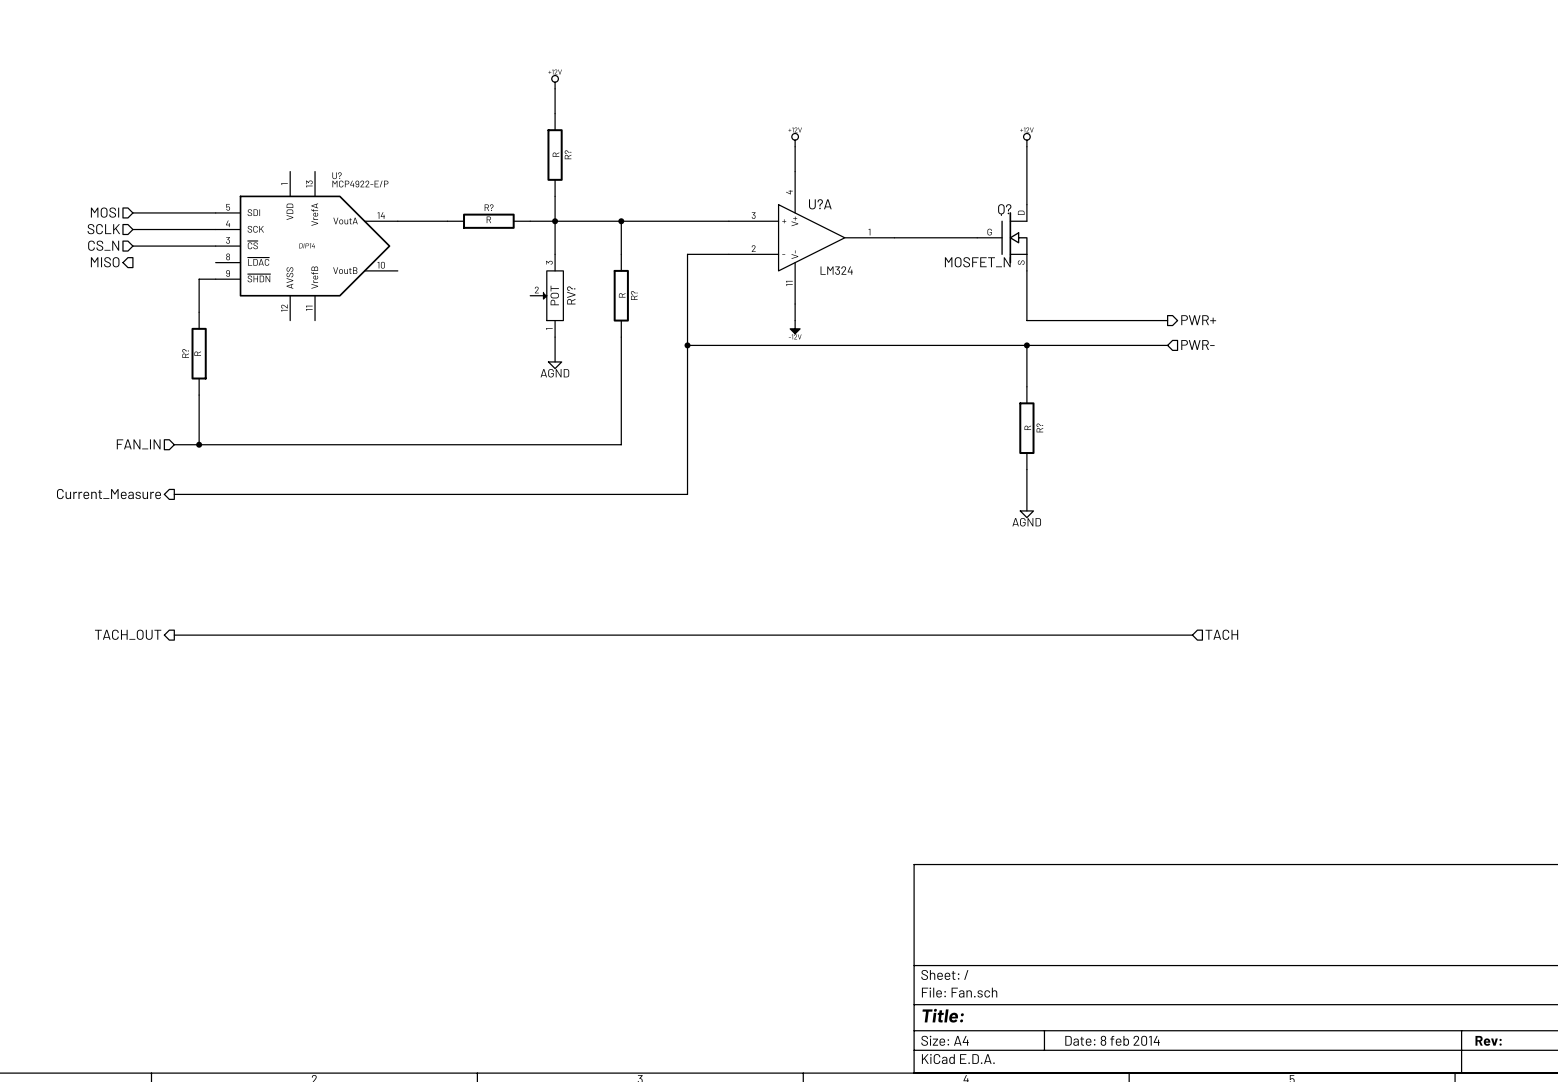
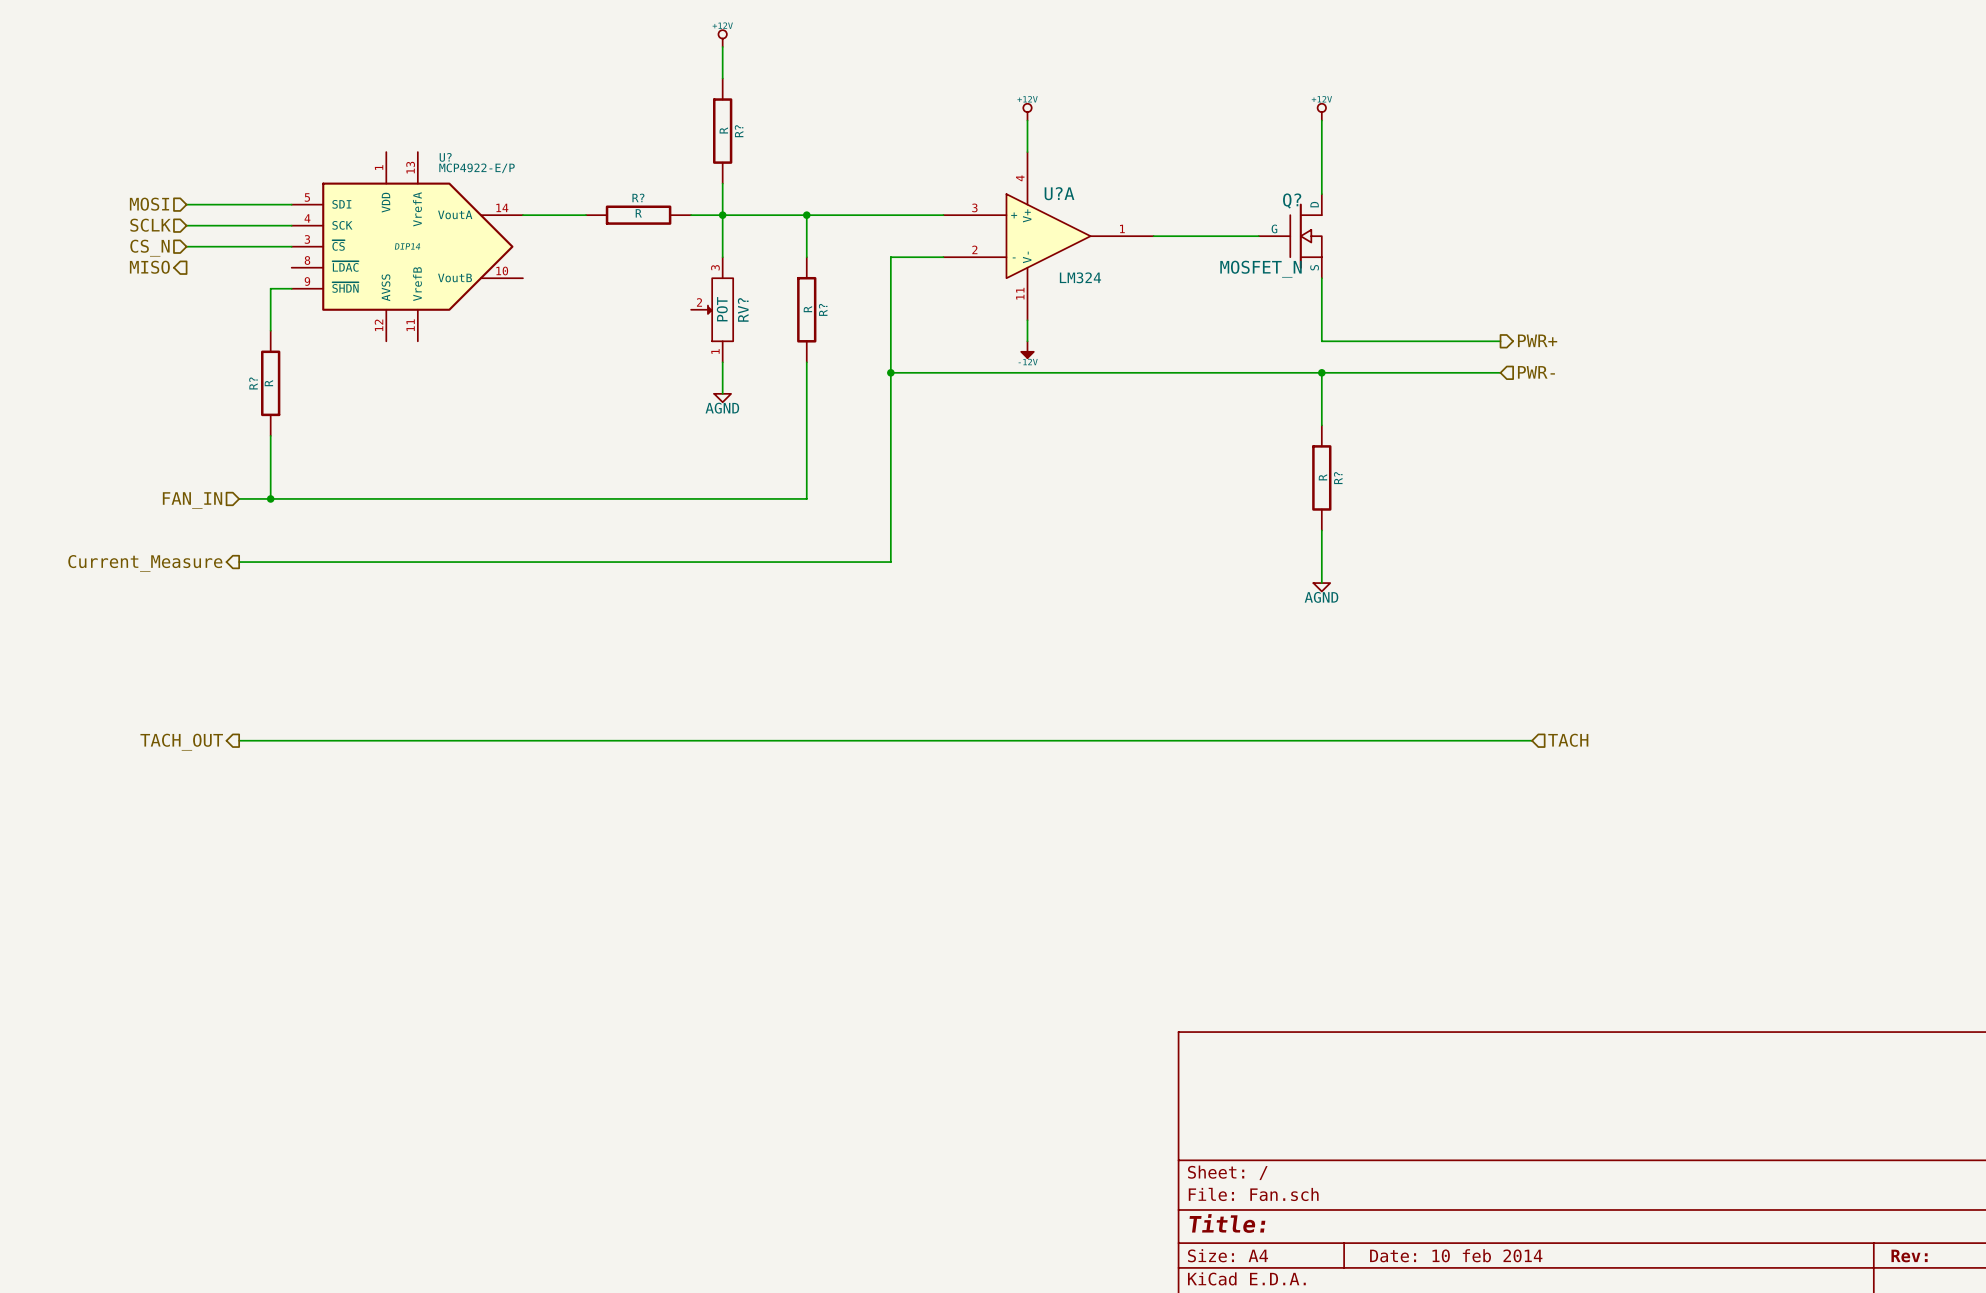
title block: Date: 8 feb 2014 (1112, 1040) -> Date: 10 feb 2014 (1456, 1255)

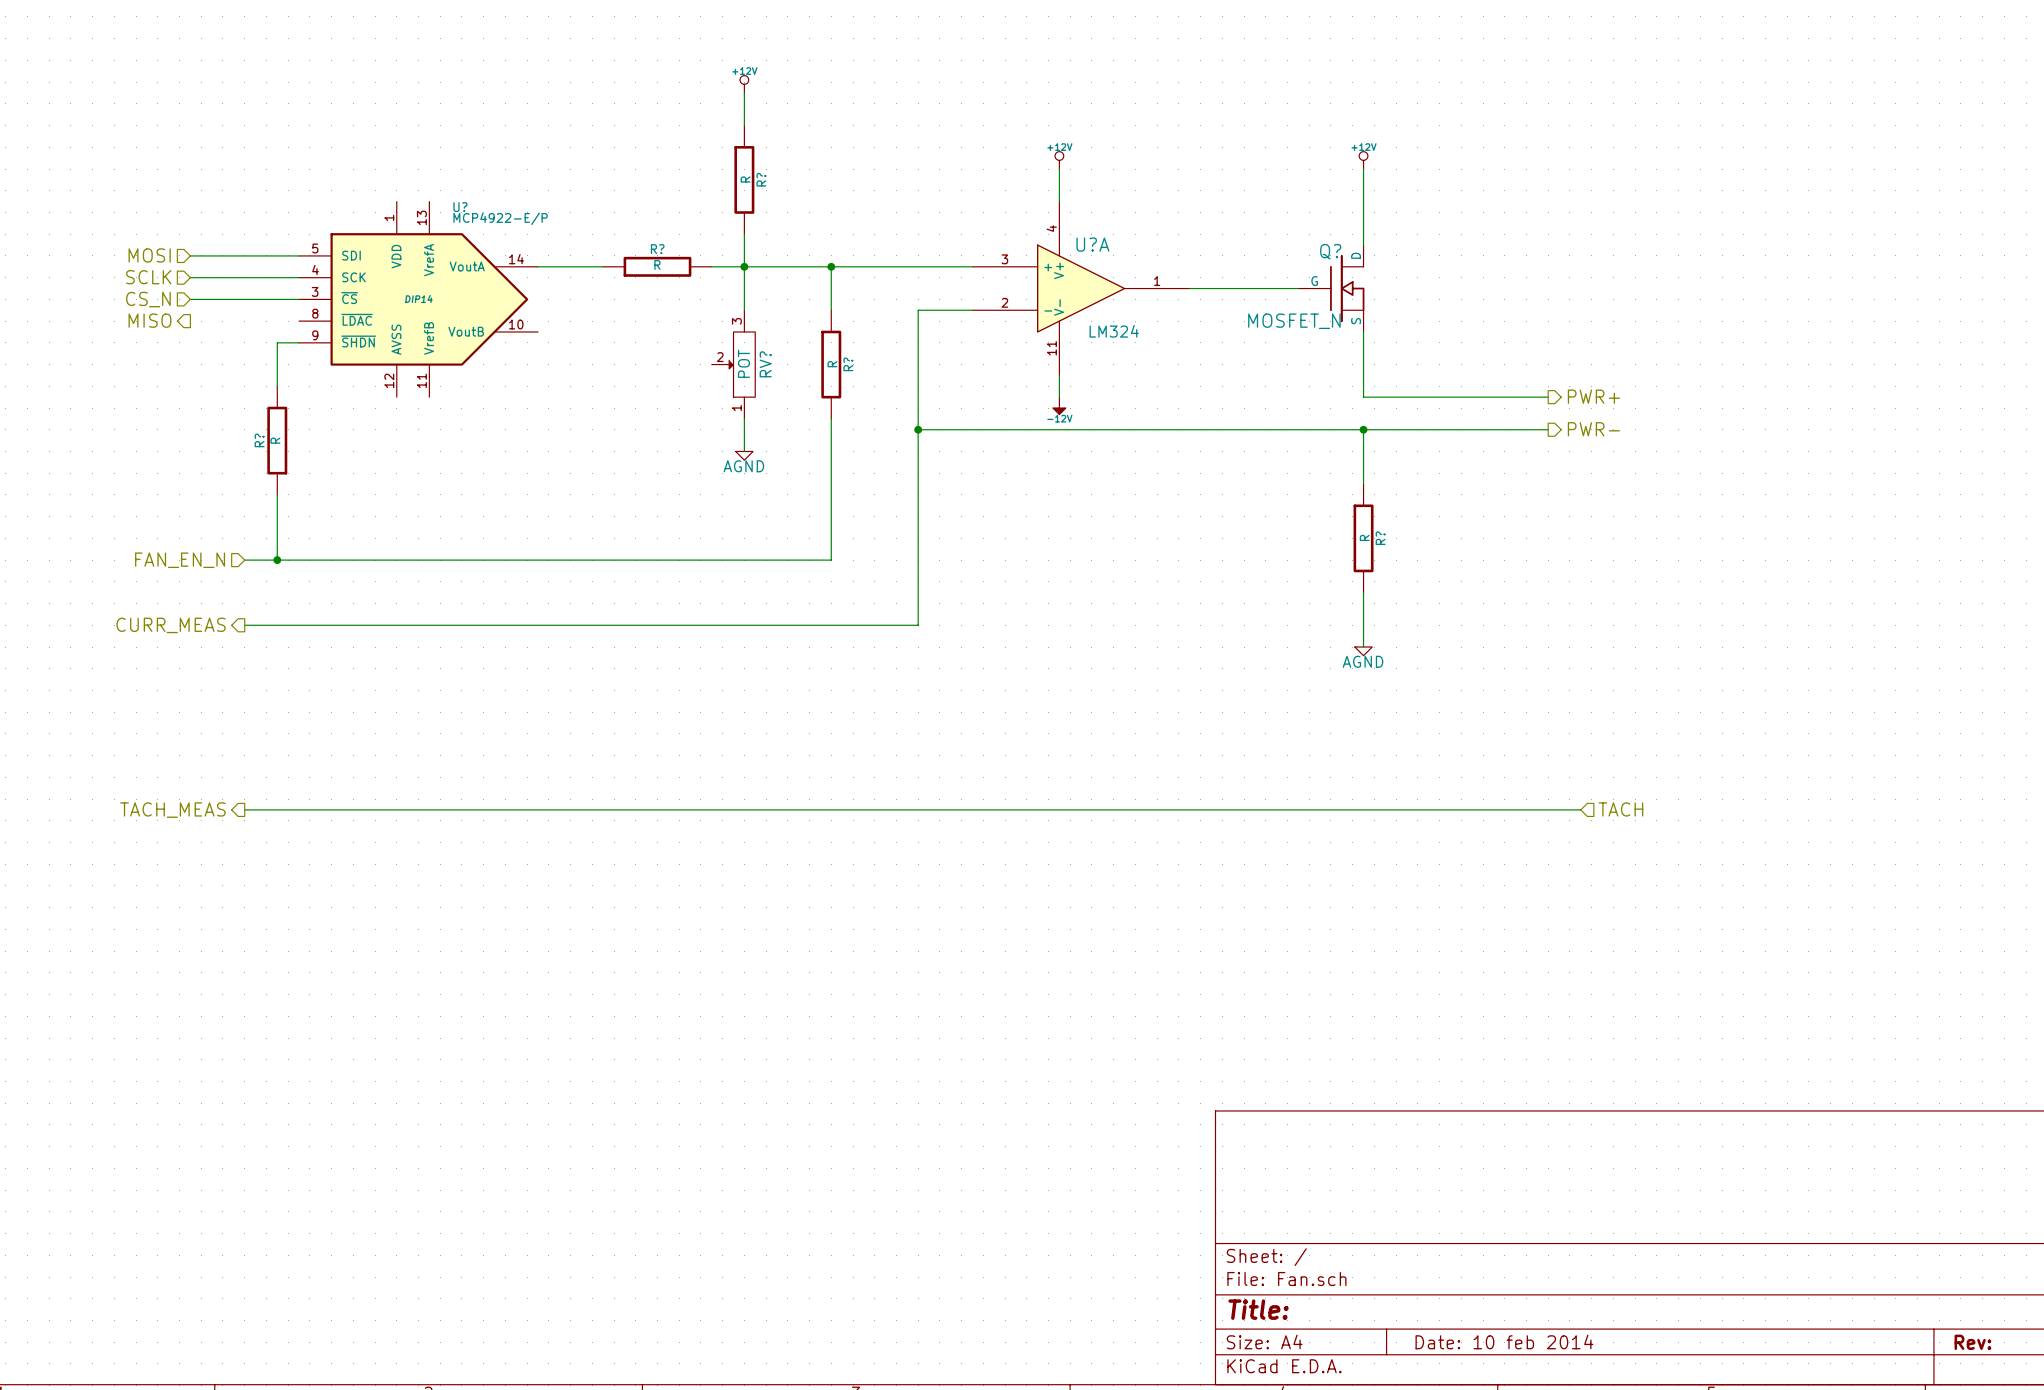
hierarchical label shape: input (1536, 372) -> output (1593, 429)
hierarchical label: FAN_IN (192, 500) -> FAN_EN_N (180, 560)
hierarchical label: Current_Measure (145, 563) -> CURR_MEAS (171, 625)
hierarchical label: TACH_OUT (181, 742) -> TACH_MEAS (172, 810)

